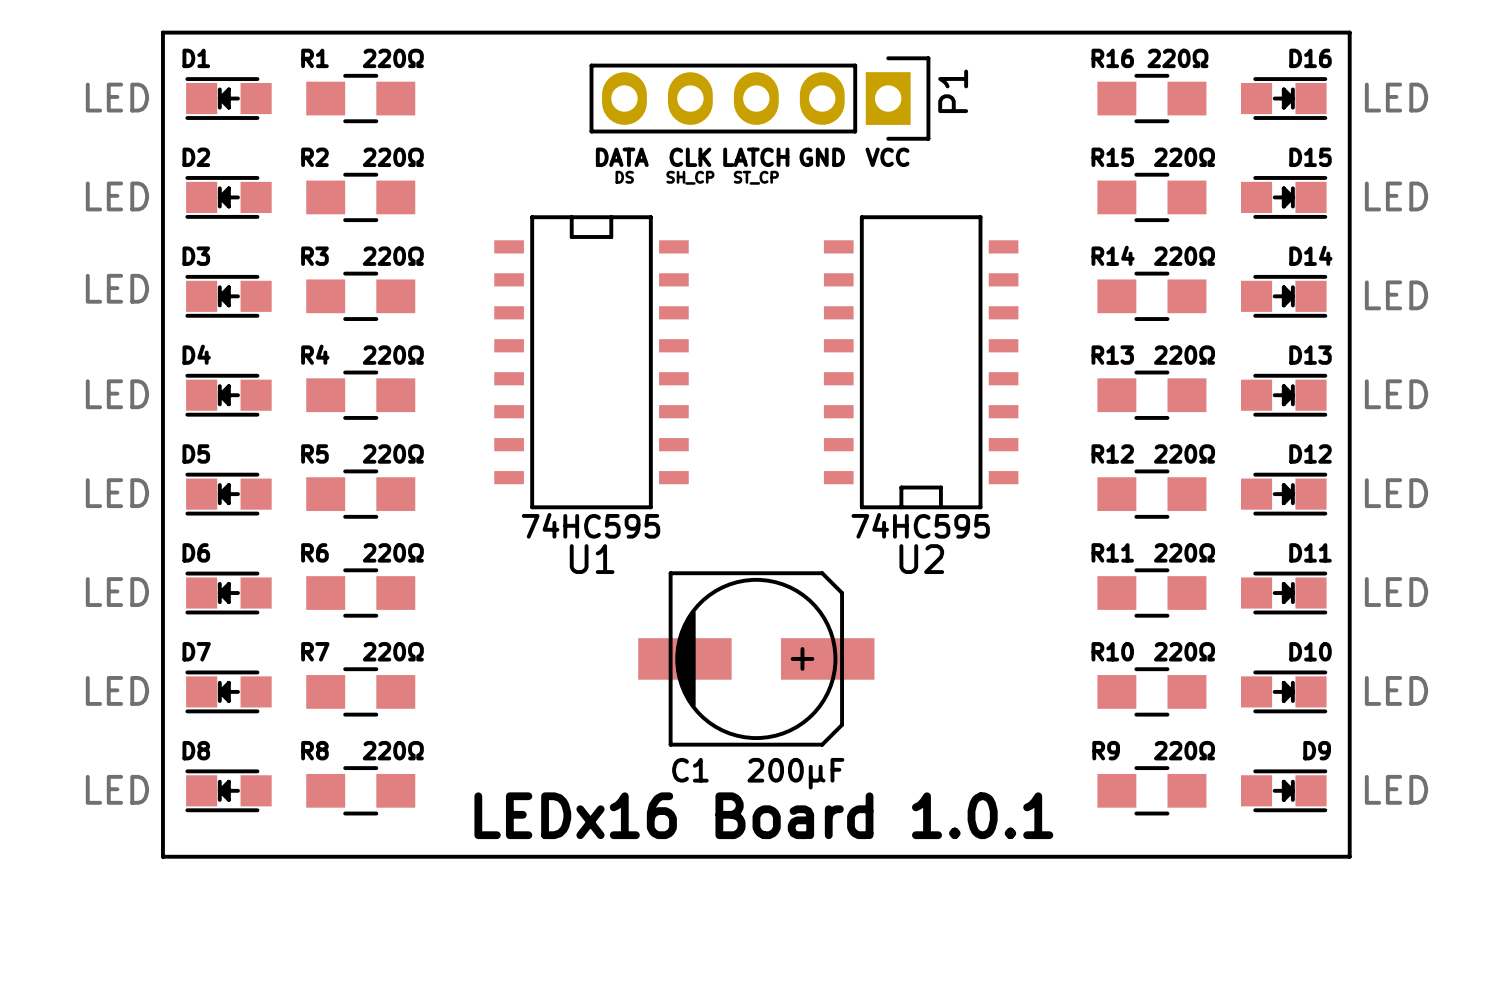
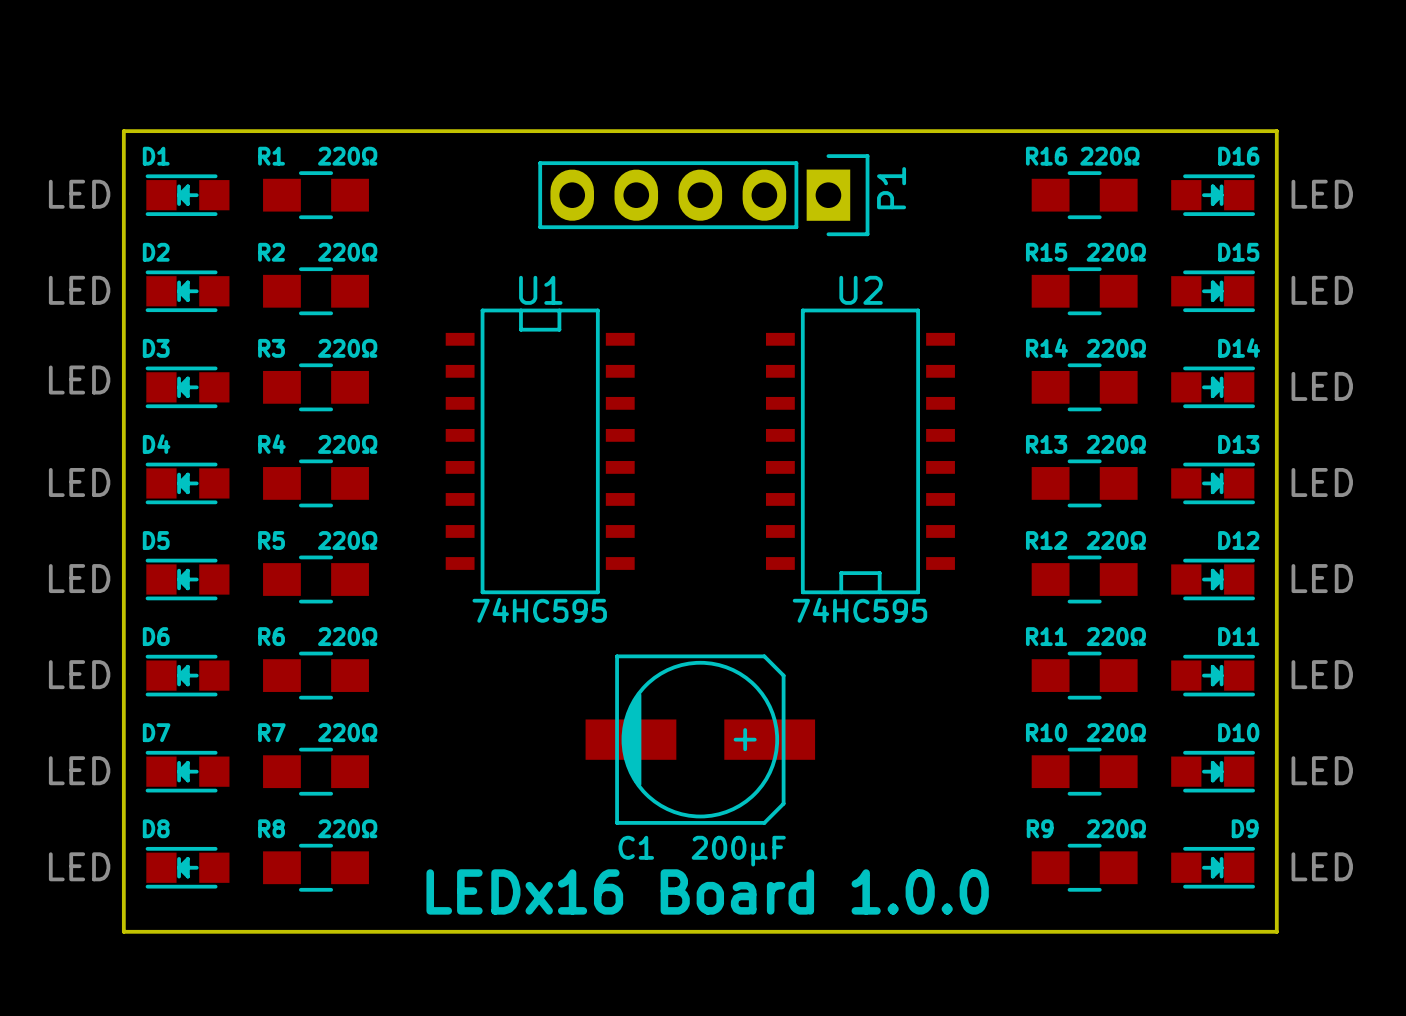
text: DATA (622, 157) -> none
text: CLK (690, 157) -> none
text: LATCH (756, 157) -> none
text: GND (822, 157) -> none
text: VCC (887, 157) -> none
text: DS (624, 177) -> none
text: SH_CP (690, 177) -> none
text: ST_CP (756, 177) -> none
U1 name position: U1 (592, 559) -> U1 (540, 290)
U2 name position: U2 (921, 559) -> U2 (861, 290)
text: LEDx16 Board 1.0.1 (763, 815) -> LEDx16 Board 1.0.0 (707, 891)

